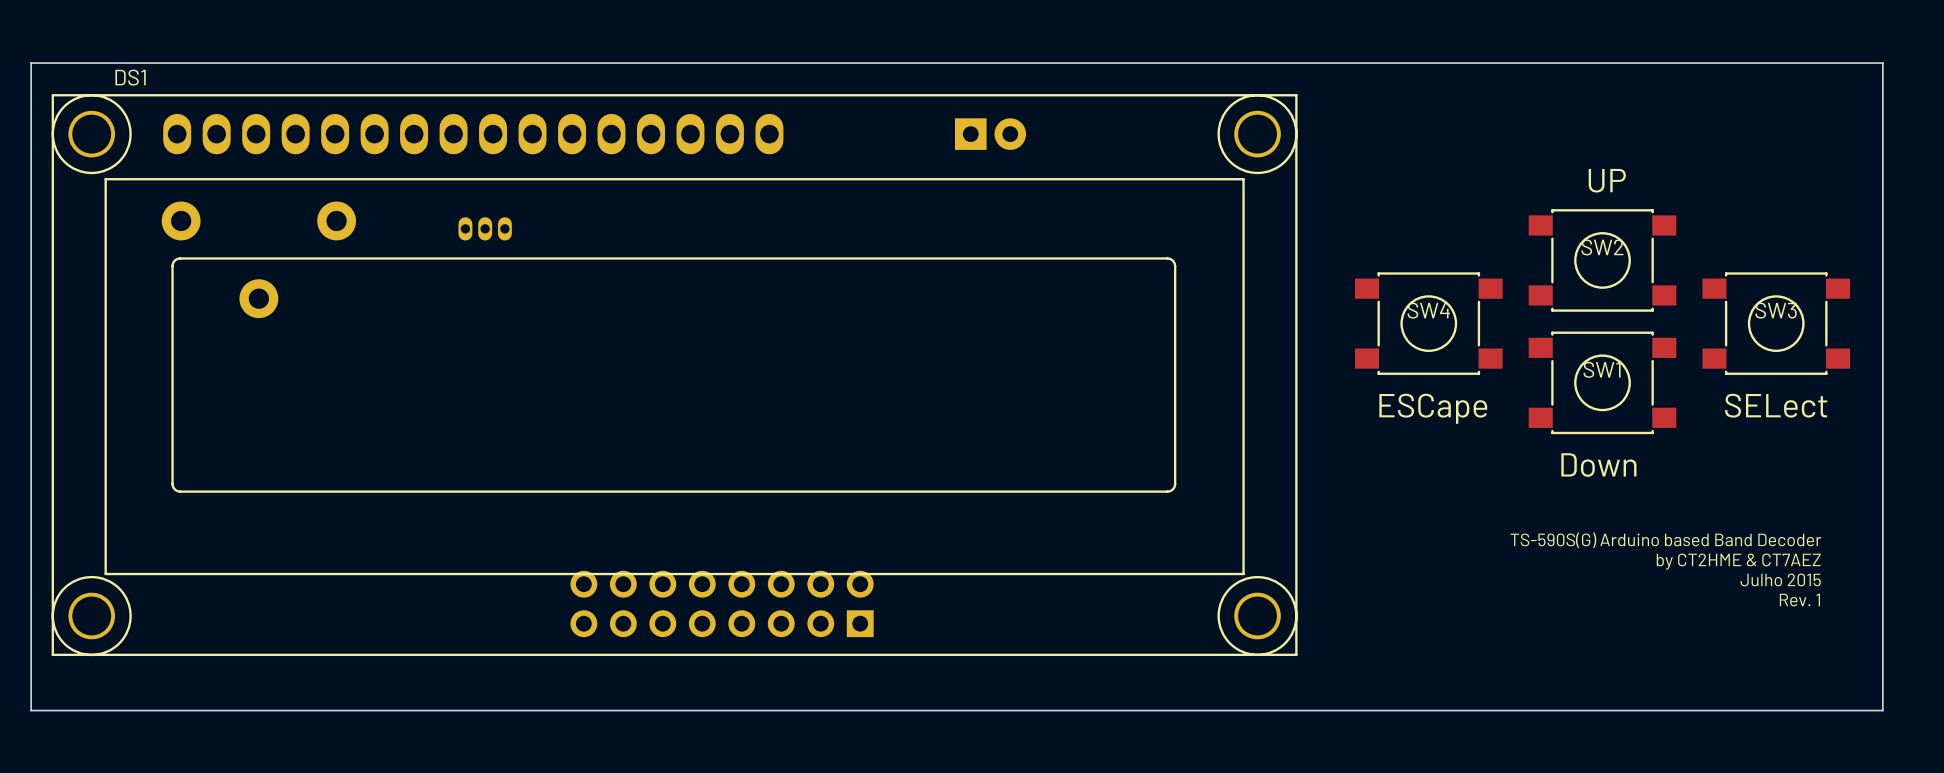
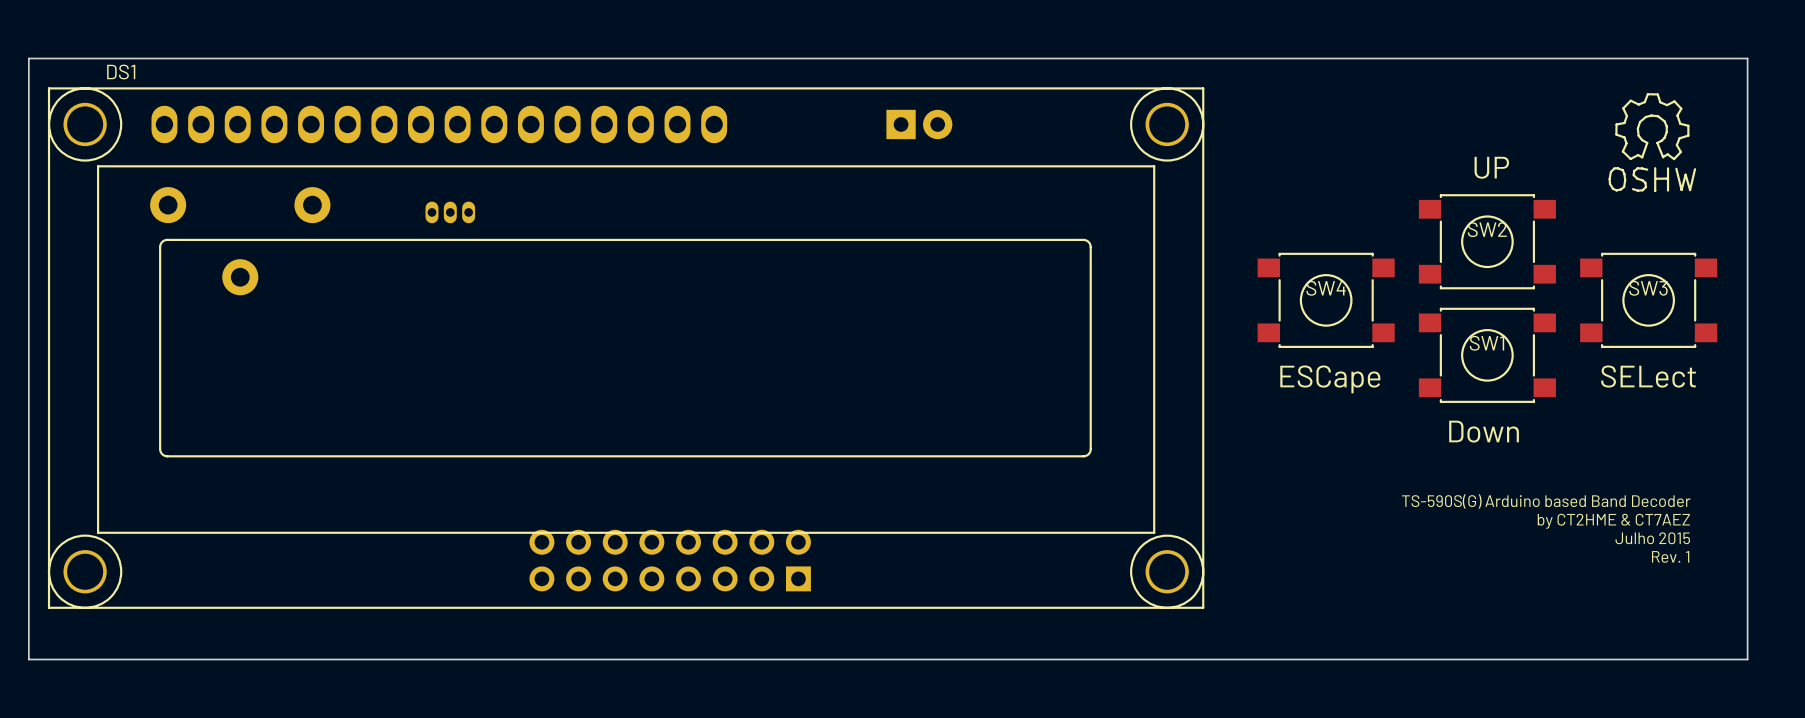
drawing: none -> [1608, 93, 1697, 192]

